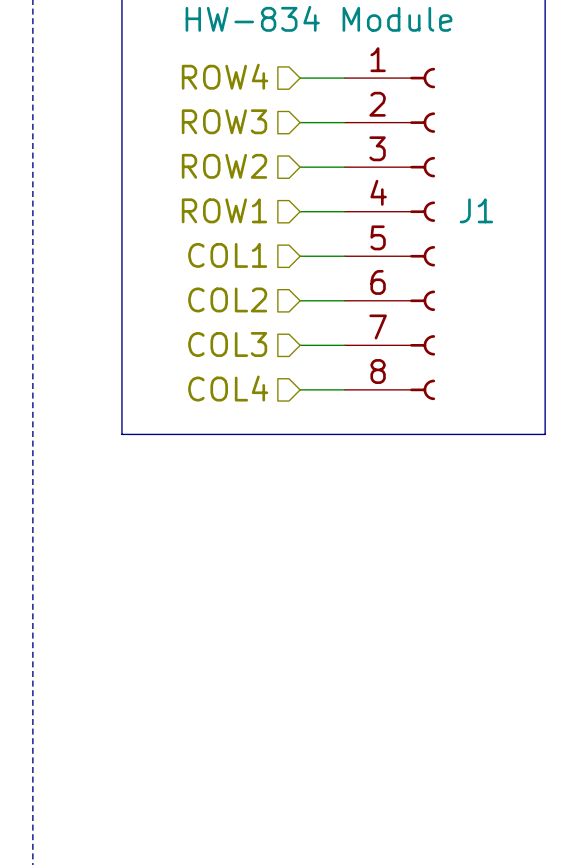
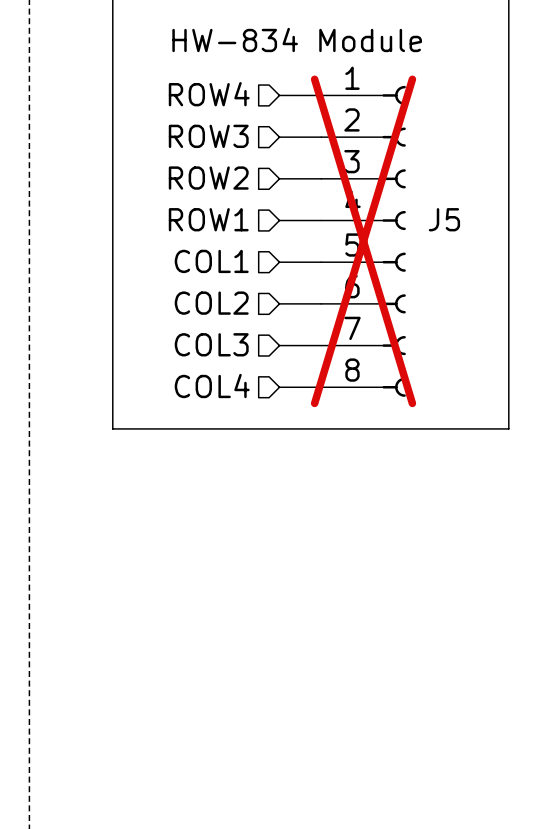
J1 name: J1 (476, 210) -> J5 (444, 219)
J1 do-not-place cross: none -> (363, 241)

